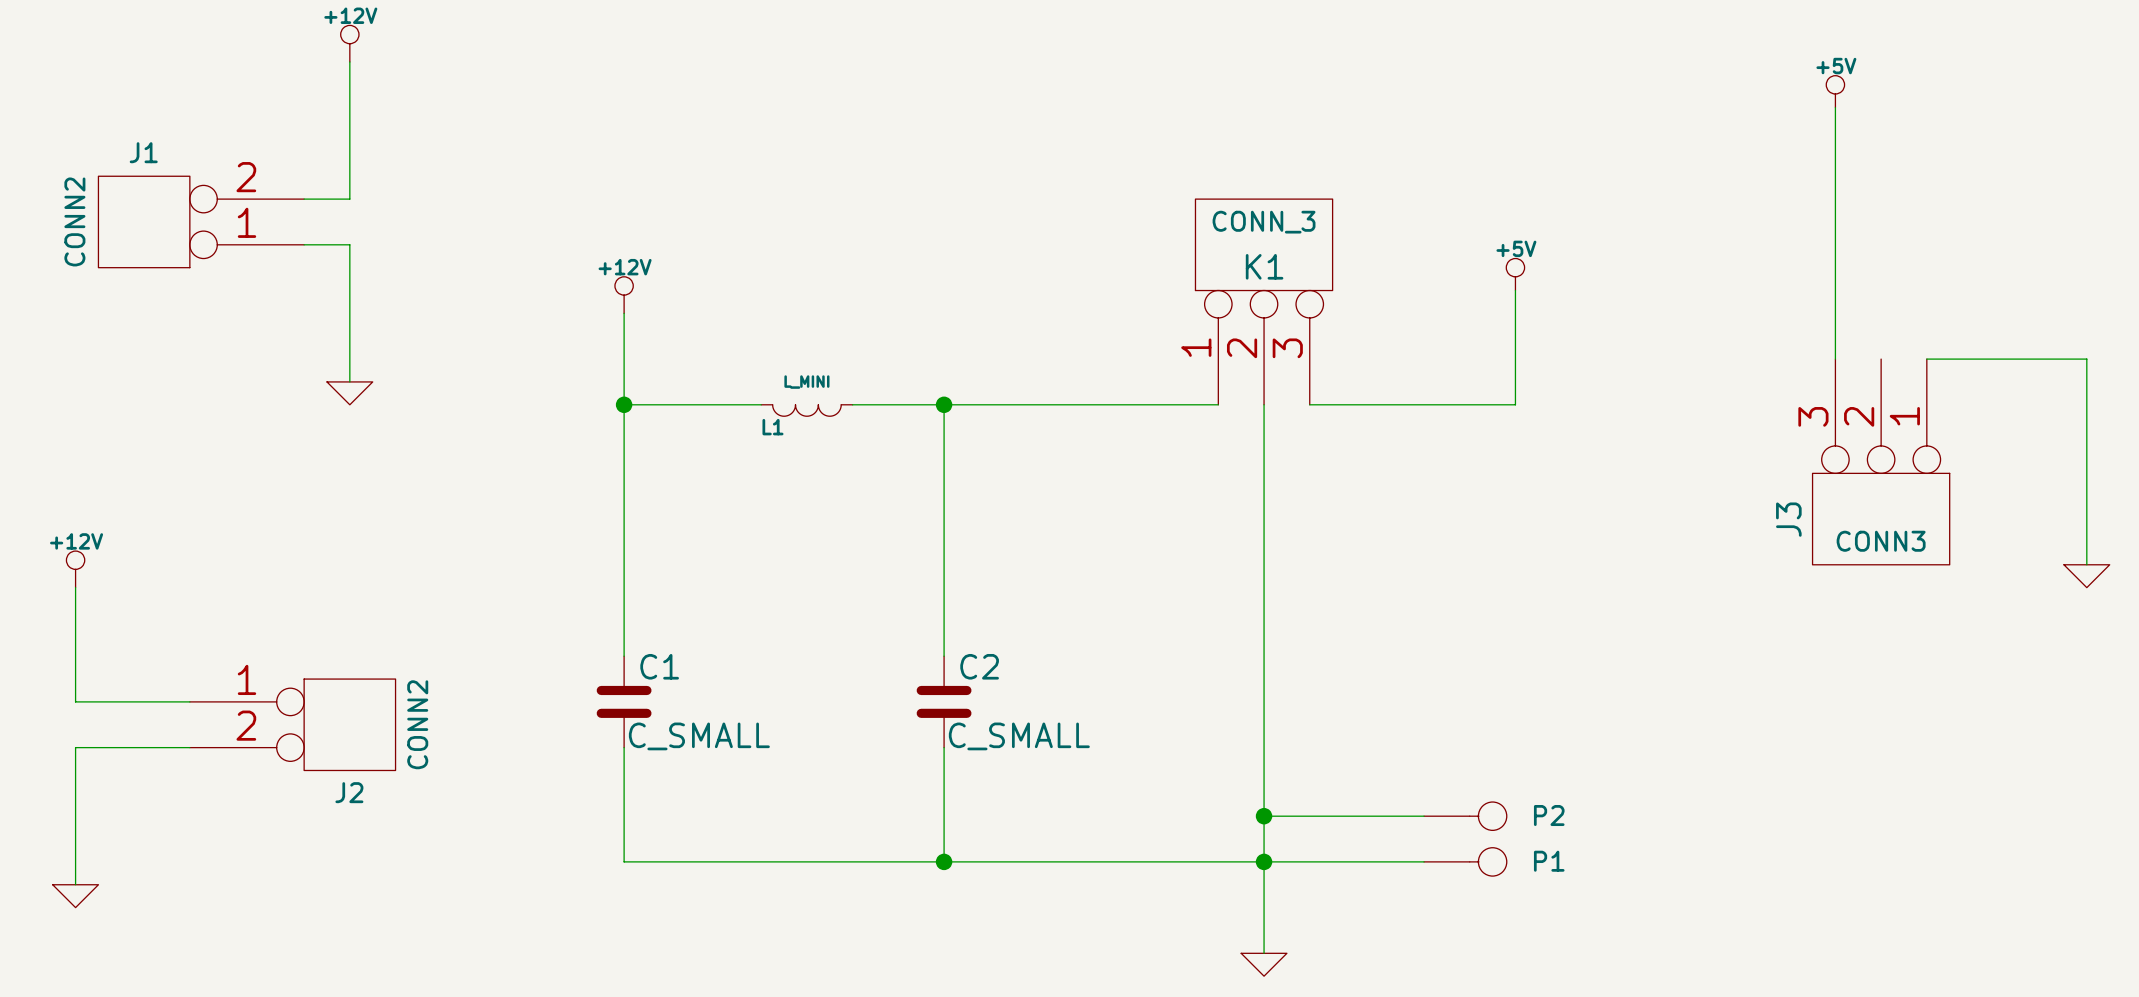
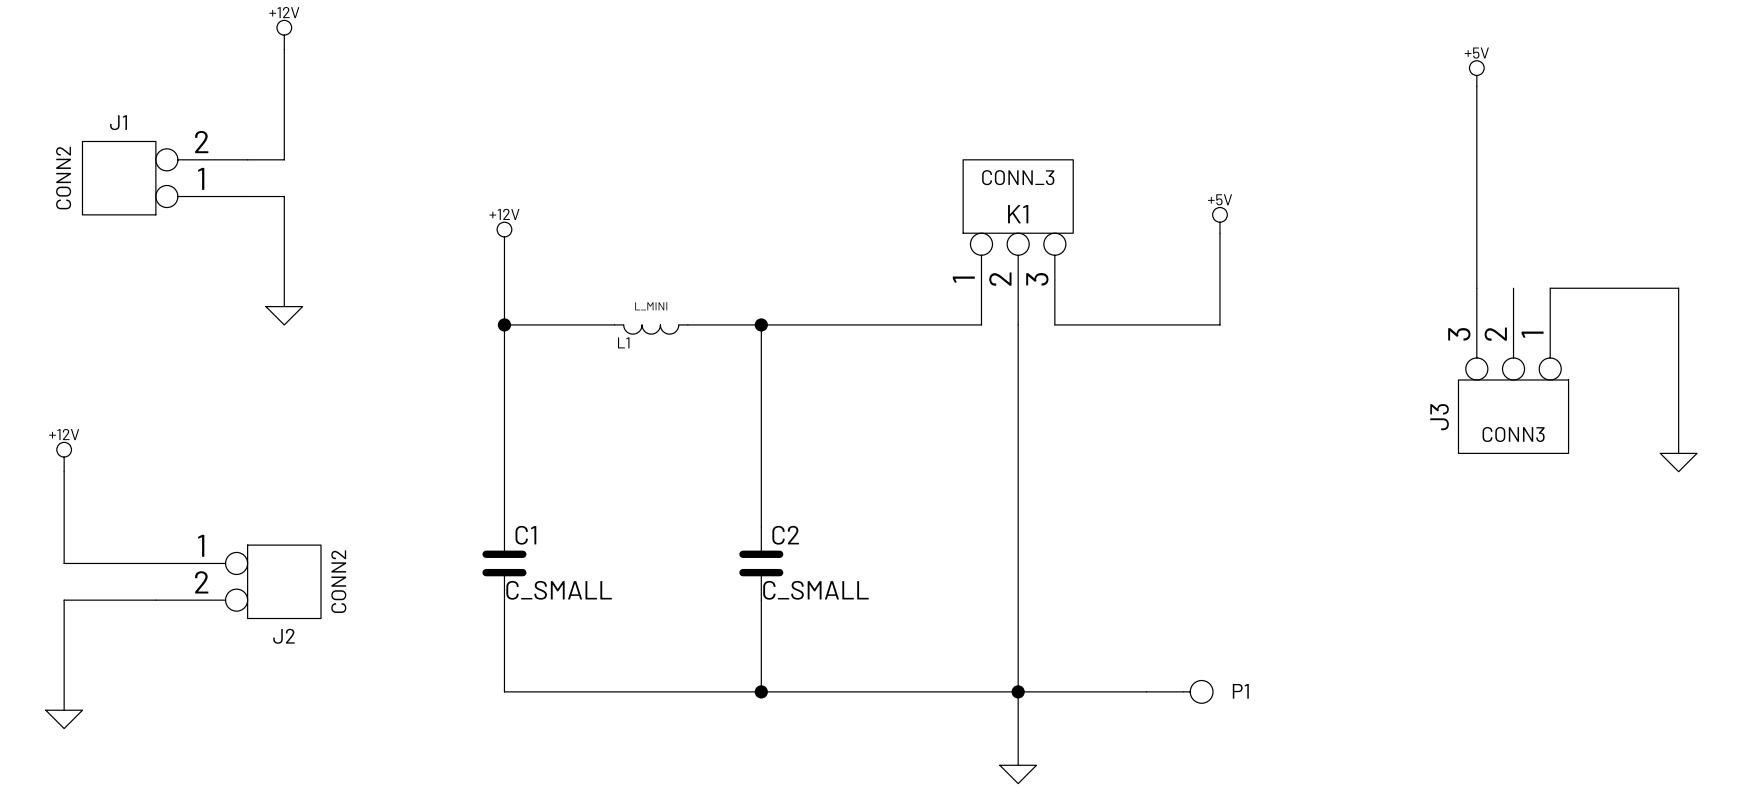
wire: (1264, 816) (1424, 816) -> none
junction: (1264, 816) -> none
P2: (1465, 816) -> none

